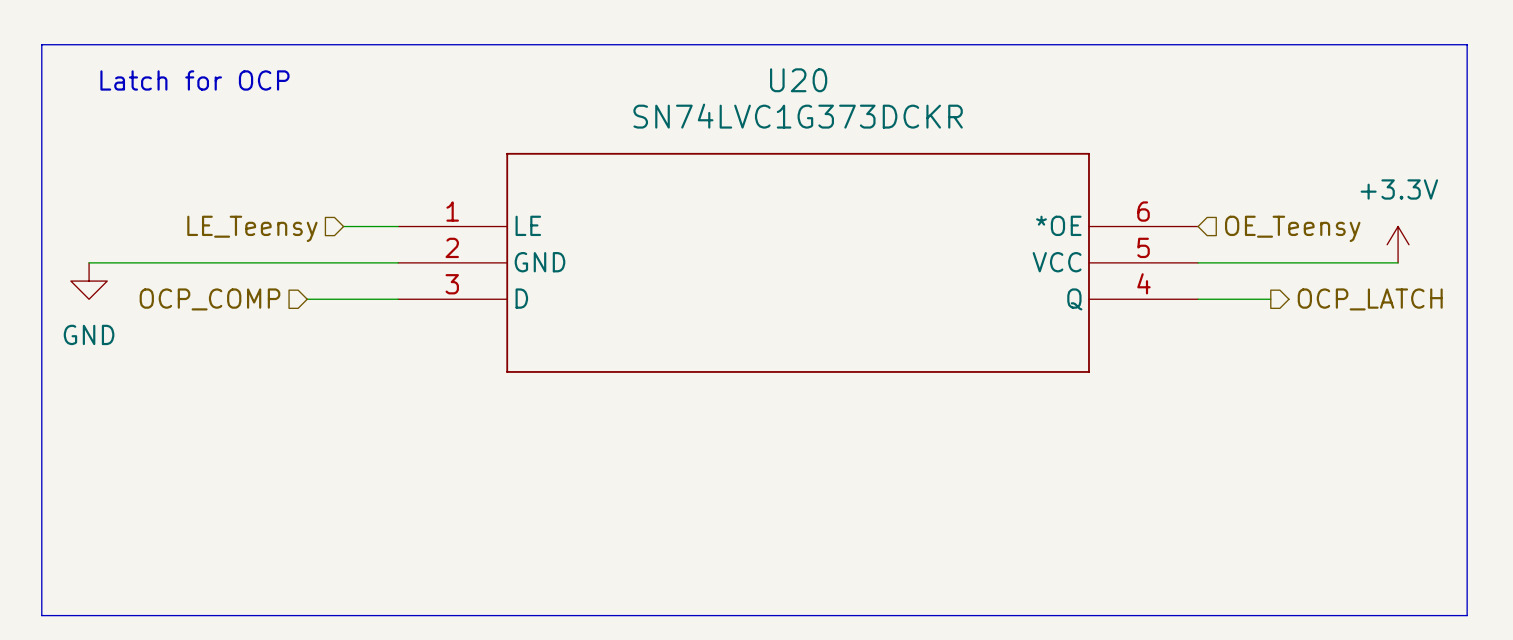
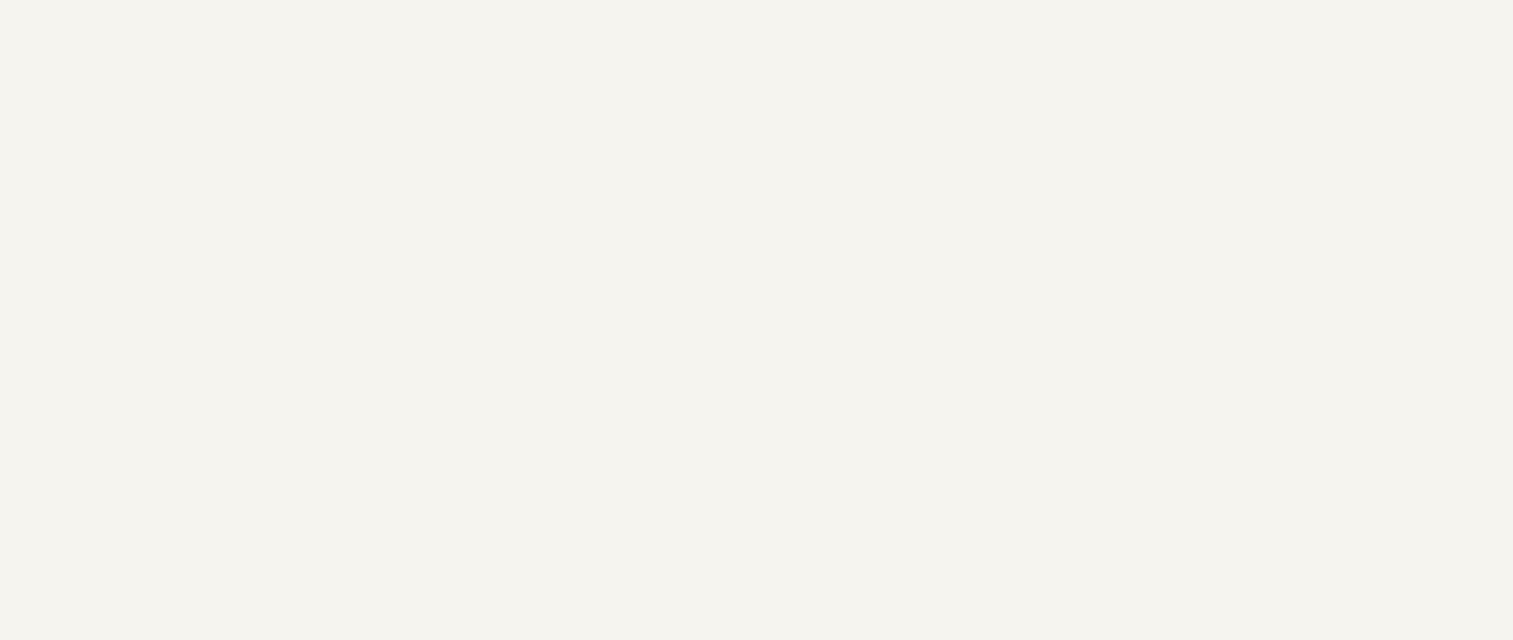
line: (41, 44) (1467, 44) (1467, 615) (41, 615) (41, 44) -> none
text: Latch for OCP (194, 80) -> none
wire: (343, 226) (398, 226) -> none
hierarchical label: LE_Teensy (252, 228) -> none
hierarchical label: OE_Teensy (1292, 228) -> none
power symbol: +3.3V (1398, 244) -> none
wire: (89, 262) (398, 262) -> none
U20: SN74LVC1G373DCKR (798, 262) -> none
wire: (1198, 262) (1398, 262) -> none
power symbol: GND (89, 281) -> none
hierarchical label: OCP_COMP (209, 299) -> none
wire: (307, 299) (398, 299) -> none
wire: (1198, 299) (1270, 299) -> none
hierarchical label: OCP_LATCH (1370, 299) -> none

